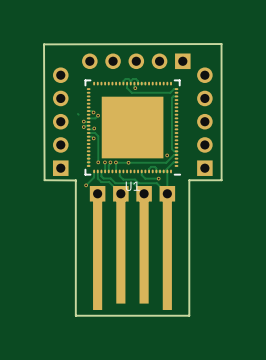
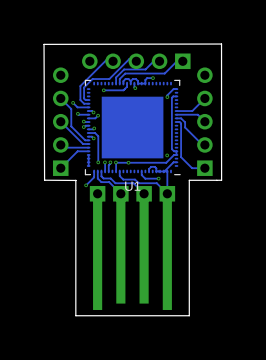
track: none -> (109, 58) (80, 86) (80, 100) (84, 103) (88, 103)
track: none -> (132, 58) (129, 58) (109, 79) (92, 79) (84, 87) (84, 98) (88, 100)
track: none -> (156, 58) (145, 69) (124, 69) (116, 77) (116, 83)
track: none -> (179, 58) (164, 73) (125, 73) (119, 78) (119, 83)
track: none -> (153, 78) (147, 78) (145, 83)
via: none -> (153, 78)
track: (127, 86) (131, 92) (170, 92) (174, 89) -> (167, 97) (174, 89)
track: none -> (127, 86) (123, 90) (103, 90)
via: none -> (103, 90)
via: none -> (167, 97)
track: none -> (60, 98) (71, 108) (71, 126) (85, 140) (88, 140)
track: none -> (204, 98) (192, 111) (176, 111)
track: none -> (73, 102) (77, 107) (88, 107)
via: none -> (73, 102)
via: none -> (77, 113)
track: none -> (88, 114) (78, 114)
track: none -> (176, 114) (197, 114) (204, 121)
track: none -> (176, 118) (181, 118) (185, 122) (185, 127) (202, 144) (204, 144)
track: none -> (60, 121) (83, 144) (88, 144)
track: none -> (176, 122) (181, 123) (181, 157) (192, 168) (204, 168)
track: none -> (60, 144) (63, 147) (88, 147)
track: none -> (88, 151) (77, 151) (60, 168)

